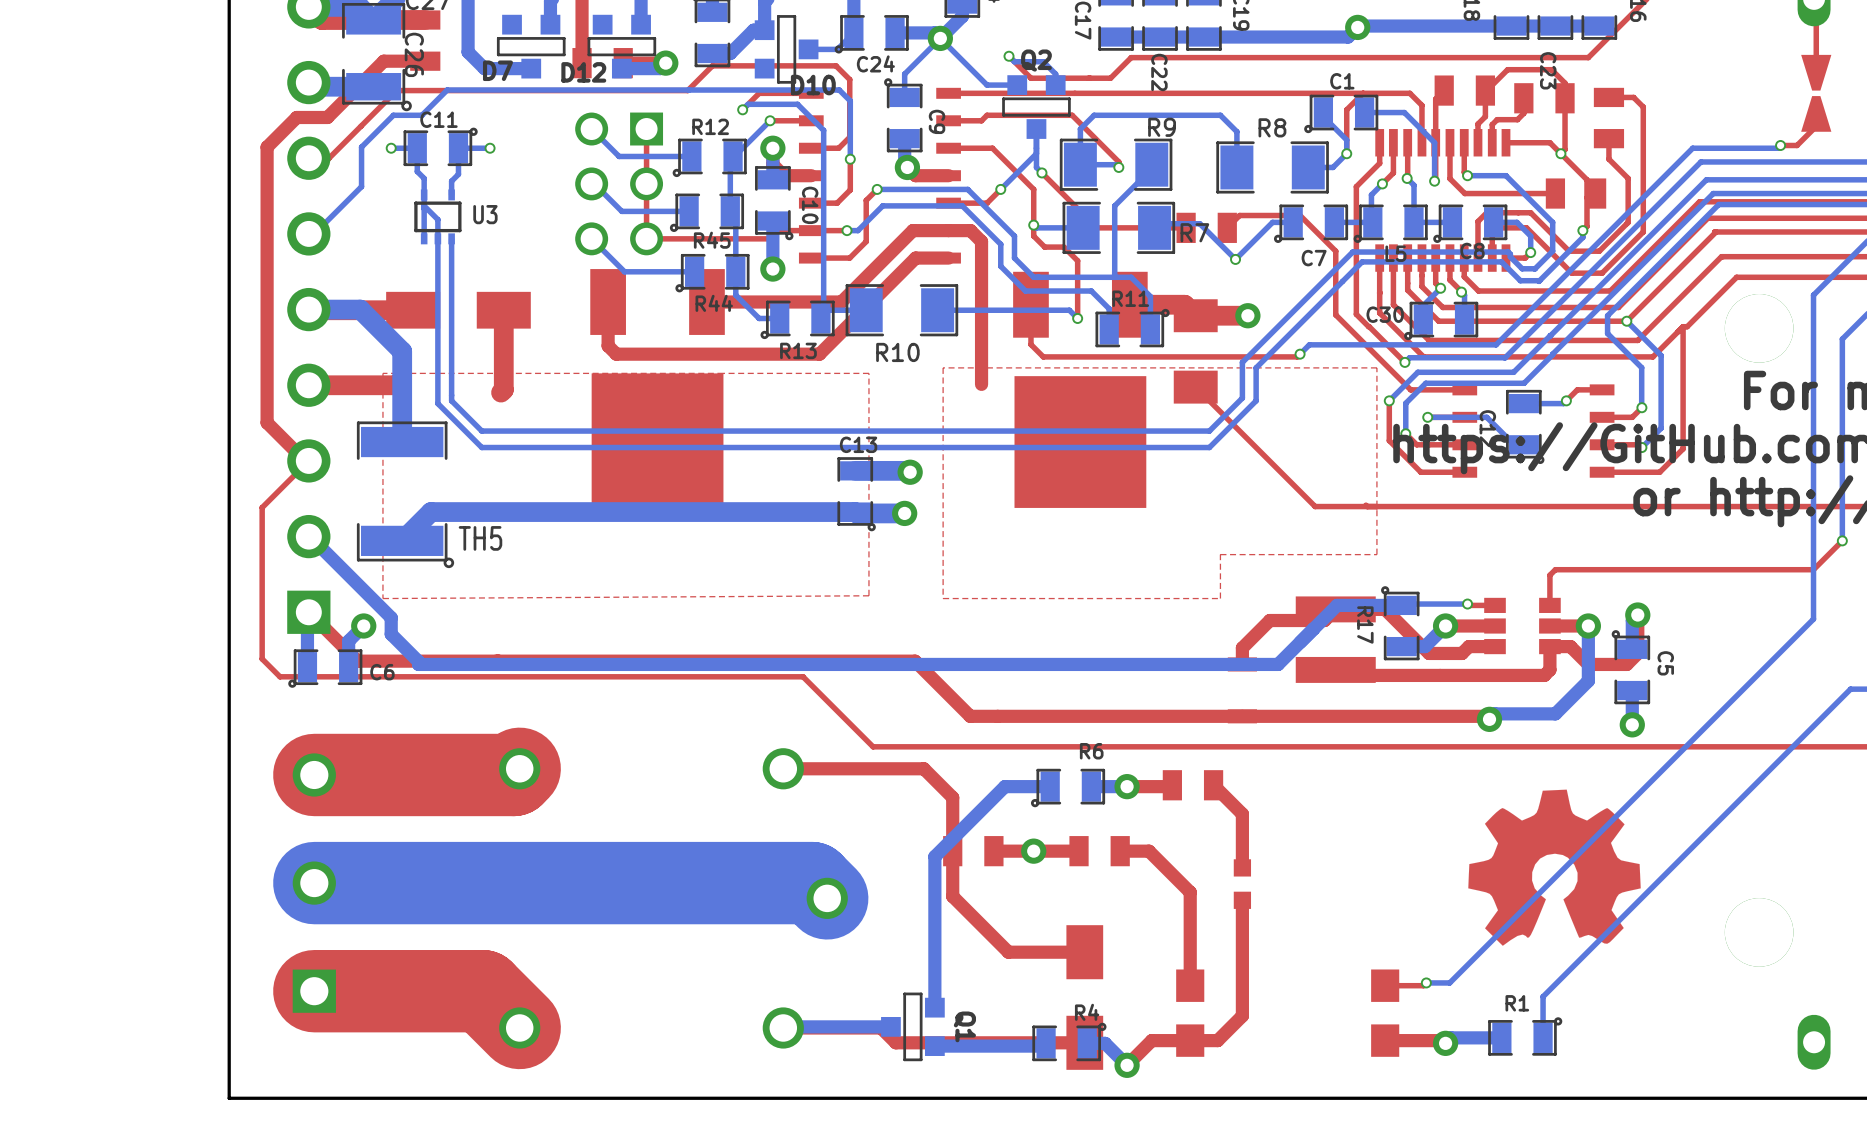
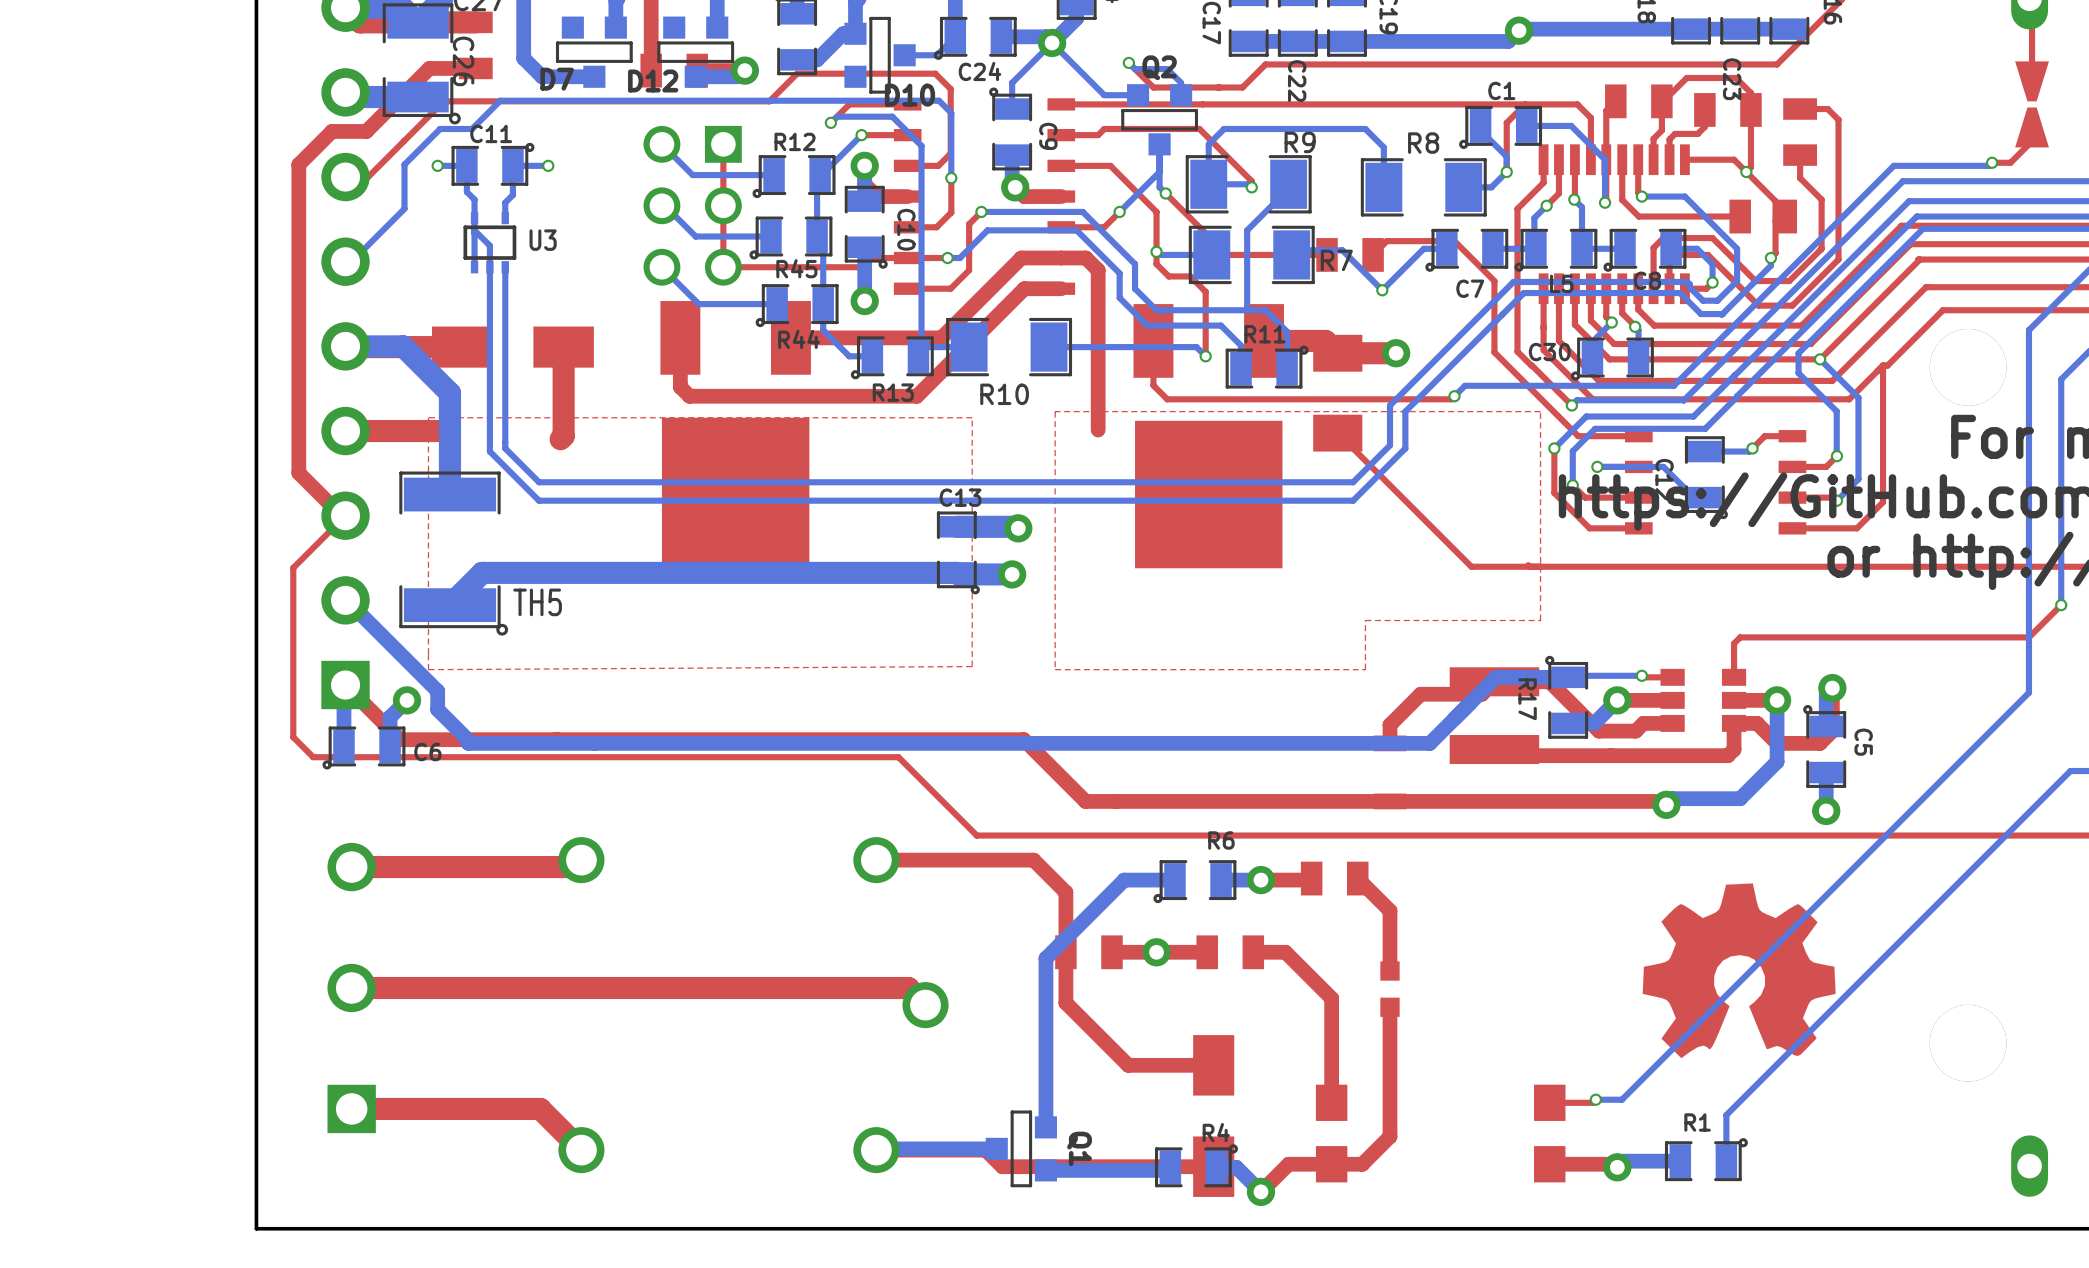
top track width: thick (519, 768) (513, 774) (314, 774) -> thin (581, 860) (574, 867) (351, 867)
bottom track: (314, 883) (811, 883) (827, 898) -> none
top track: none -> (351, 988) (908, 988) (925, 1005)
top track width: thick (314, 991) (482, 991) (519, 1027) -> thin (351, 1108) (540, 1108) (581, 1150)

